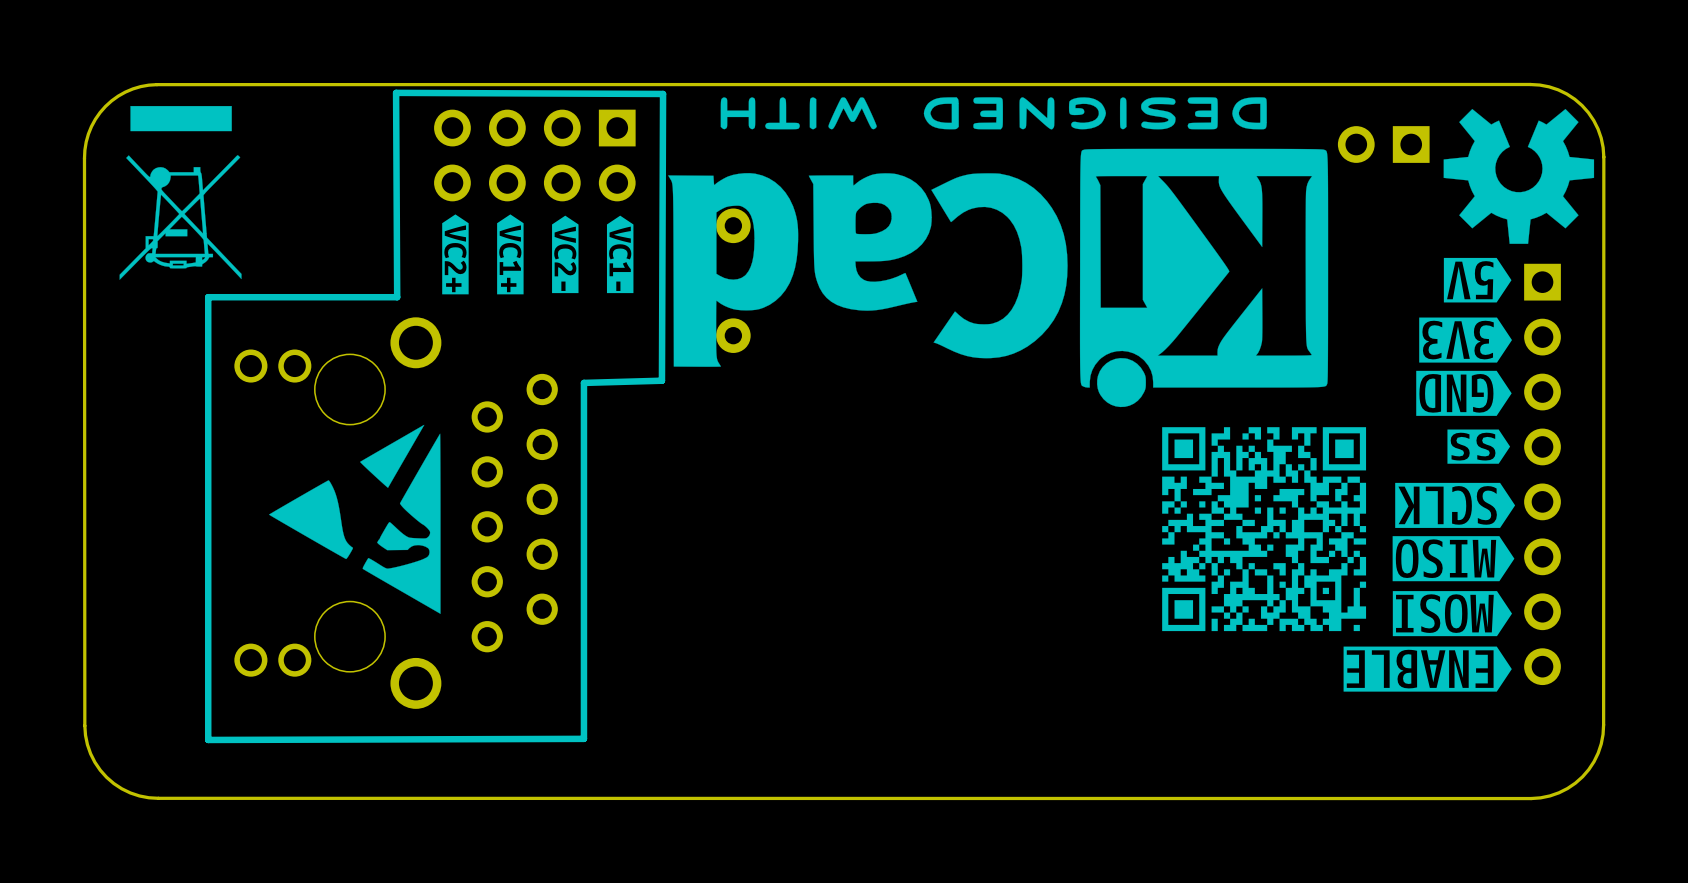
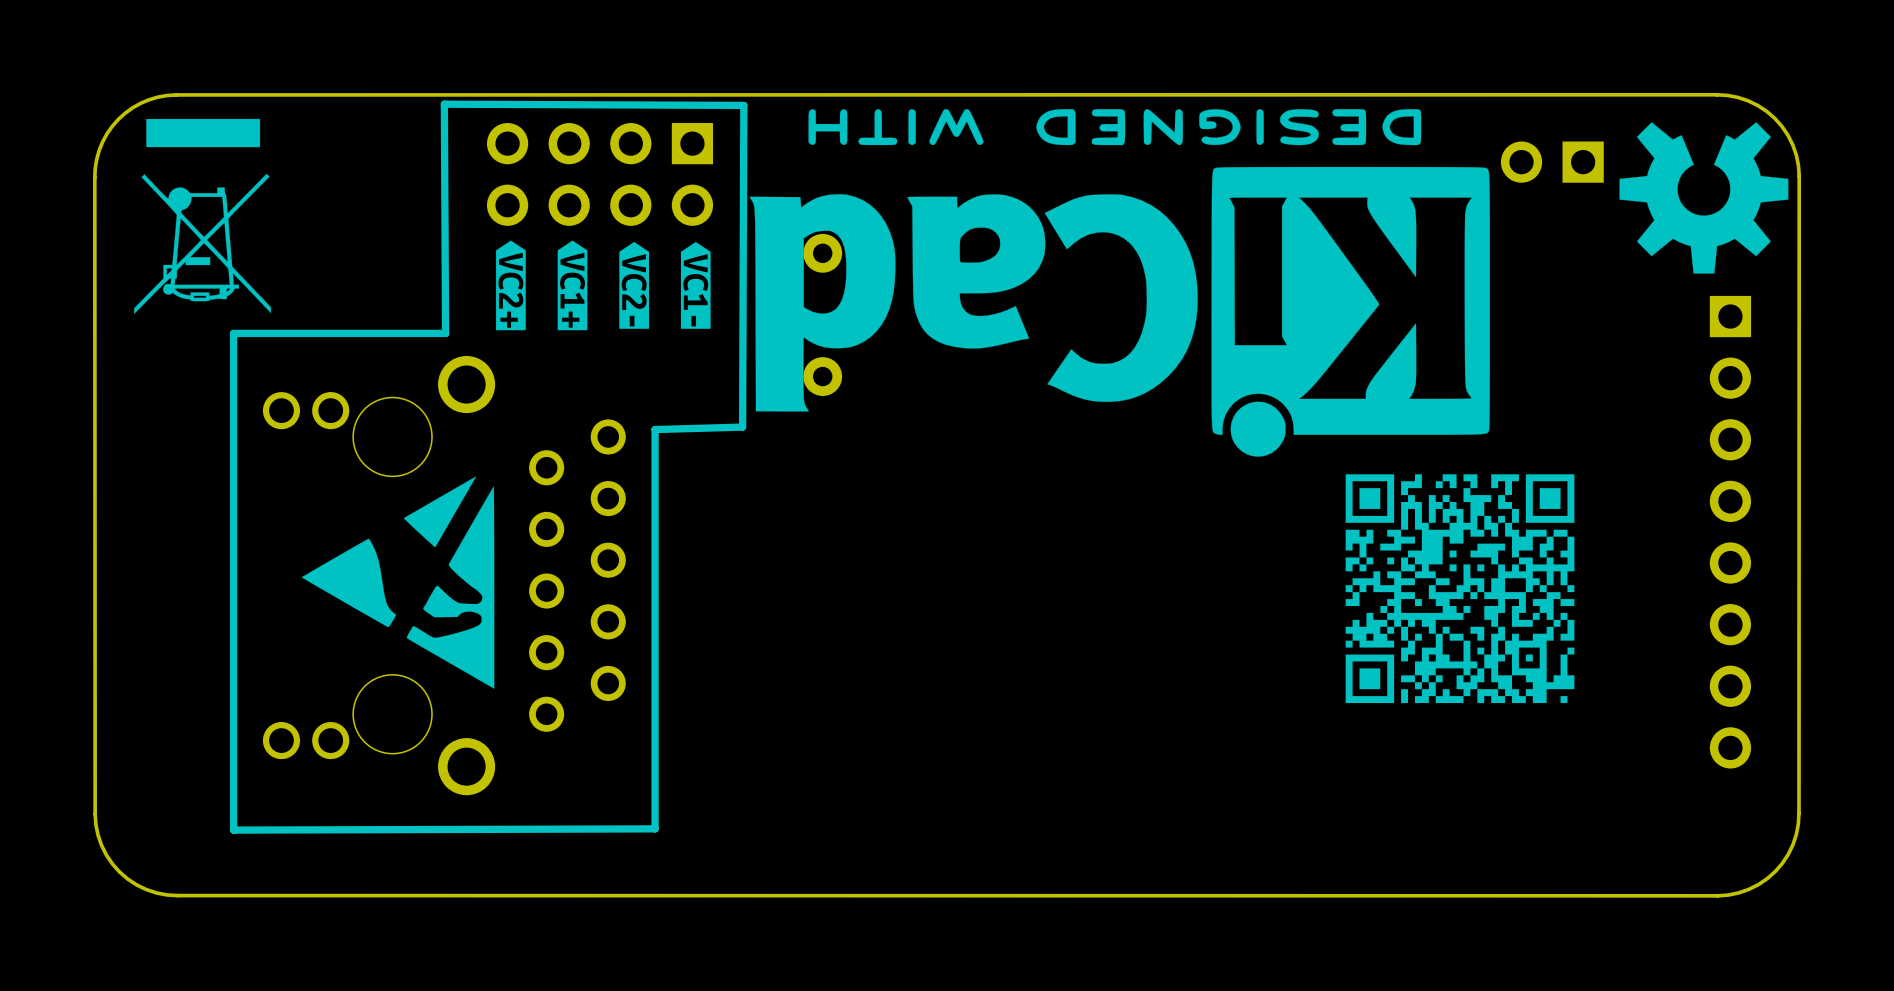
drawing: [1343, 257, 1516, 692] -> none
drawing position: (1264, 529) -> (1460, 588)

